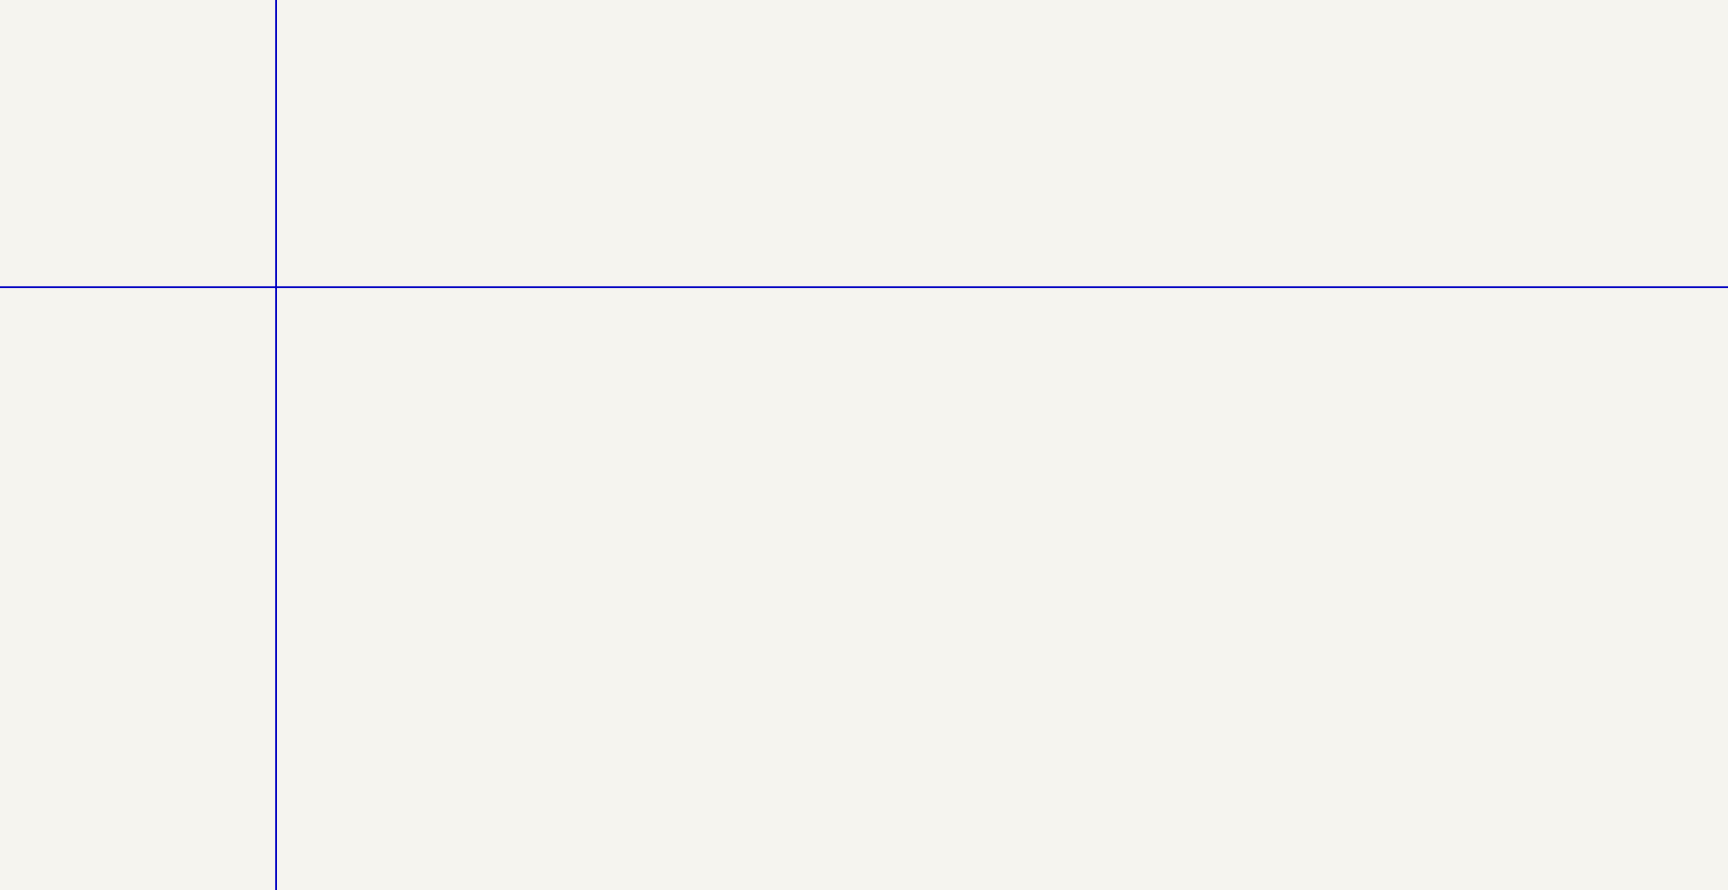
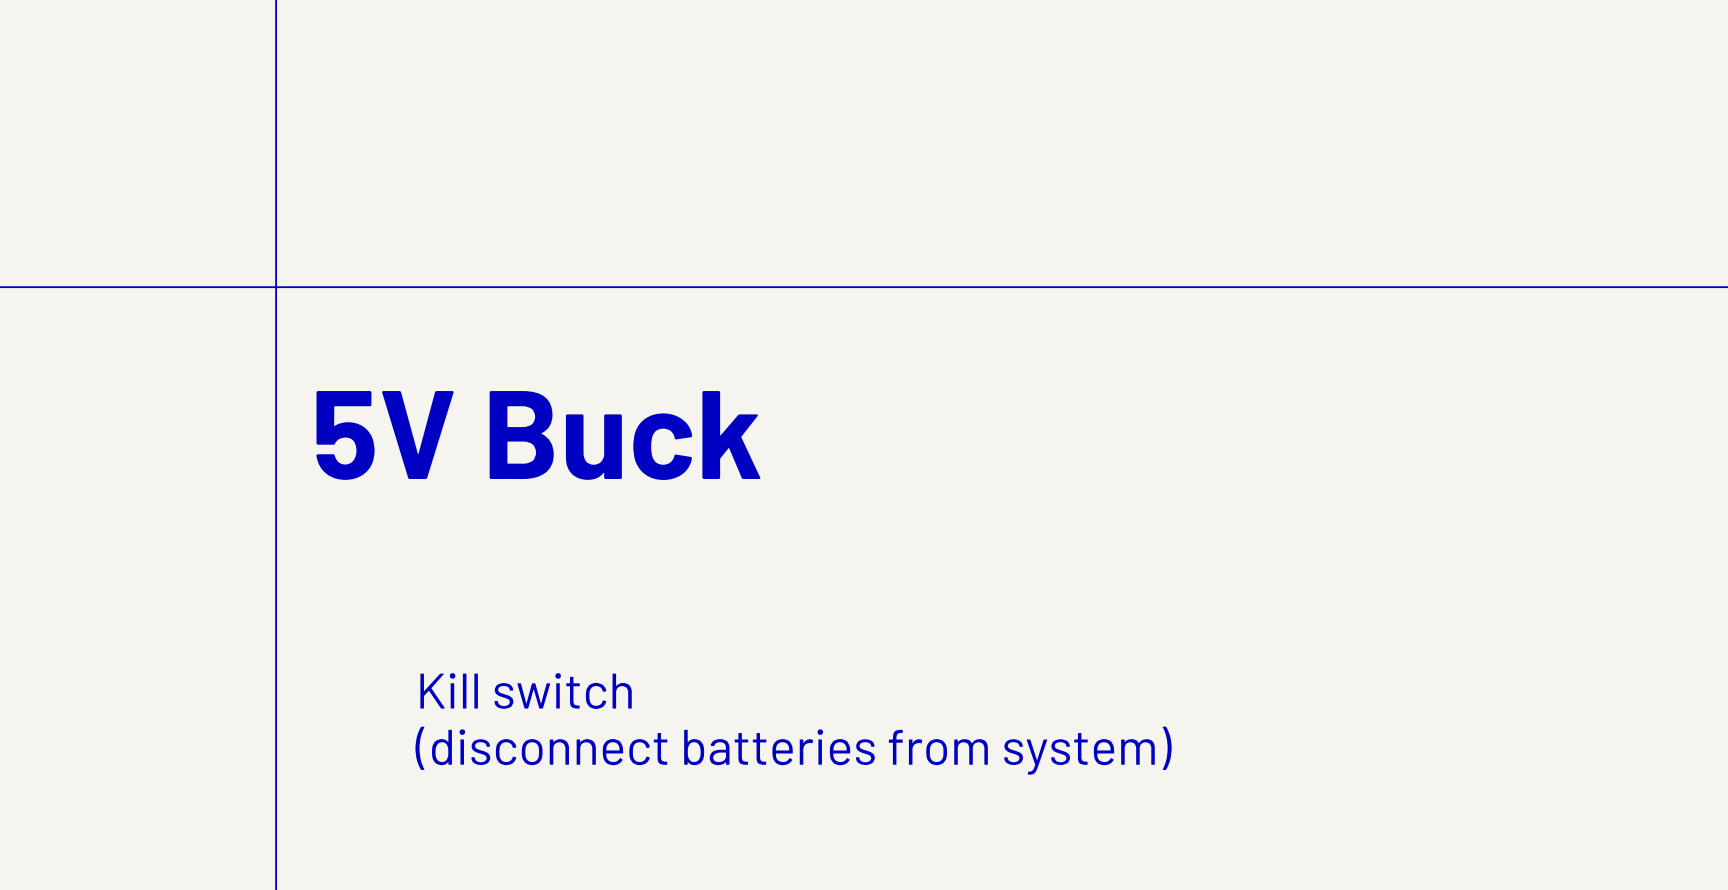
text: none -> 5V Buck (538, 435)
text: none -> Kill switch (526, 691)
text: none -> (disconnect batteries from system) (793, 750)

